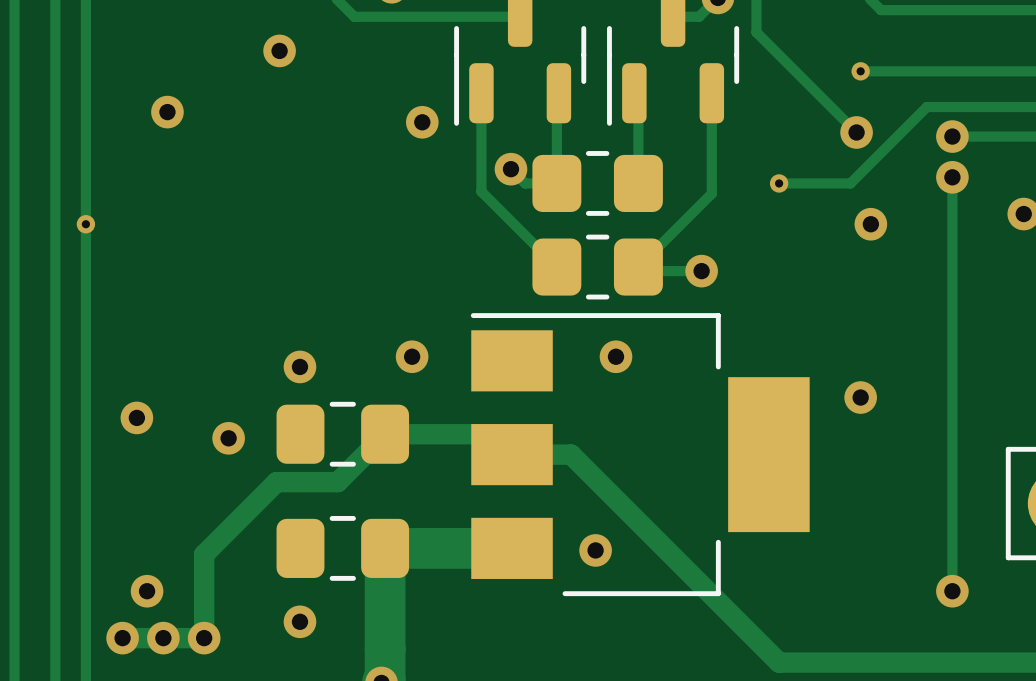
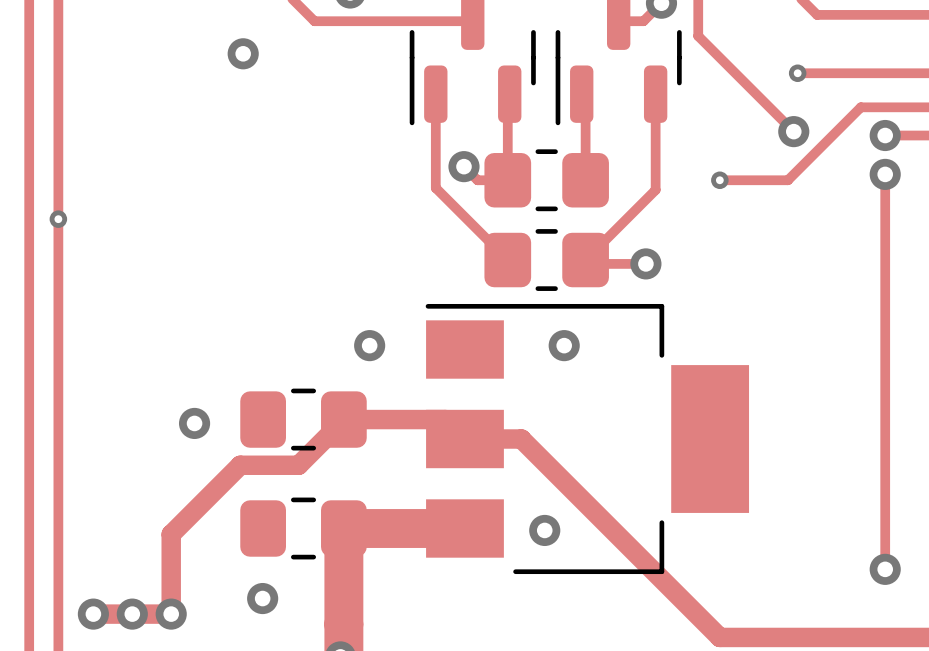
via: (167, 112) -> none
via: (422, 122) -> none
via: (870, 224) -> none
via: (299, 366) -> none
via: (860, 397) -> none
via: (136, 417) -> none
via: (147, 591) -> none

